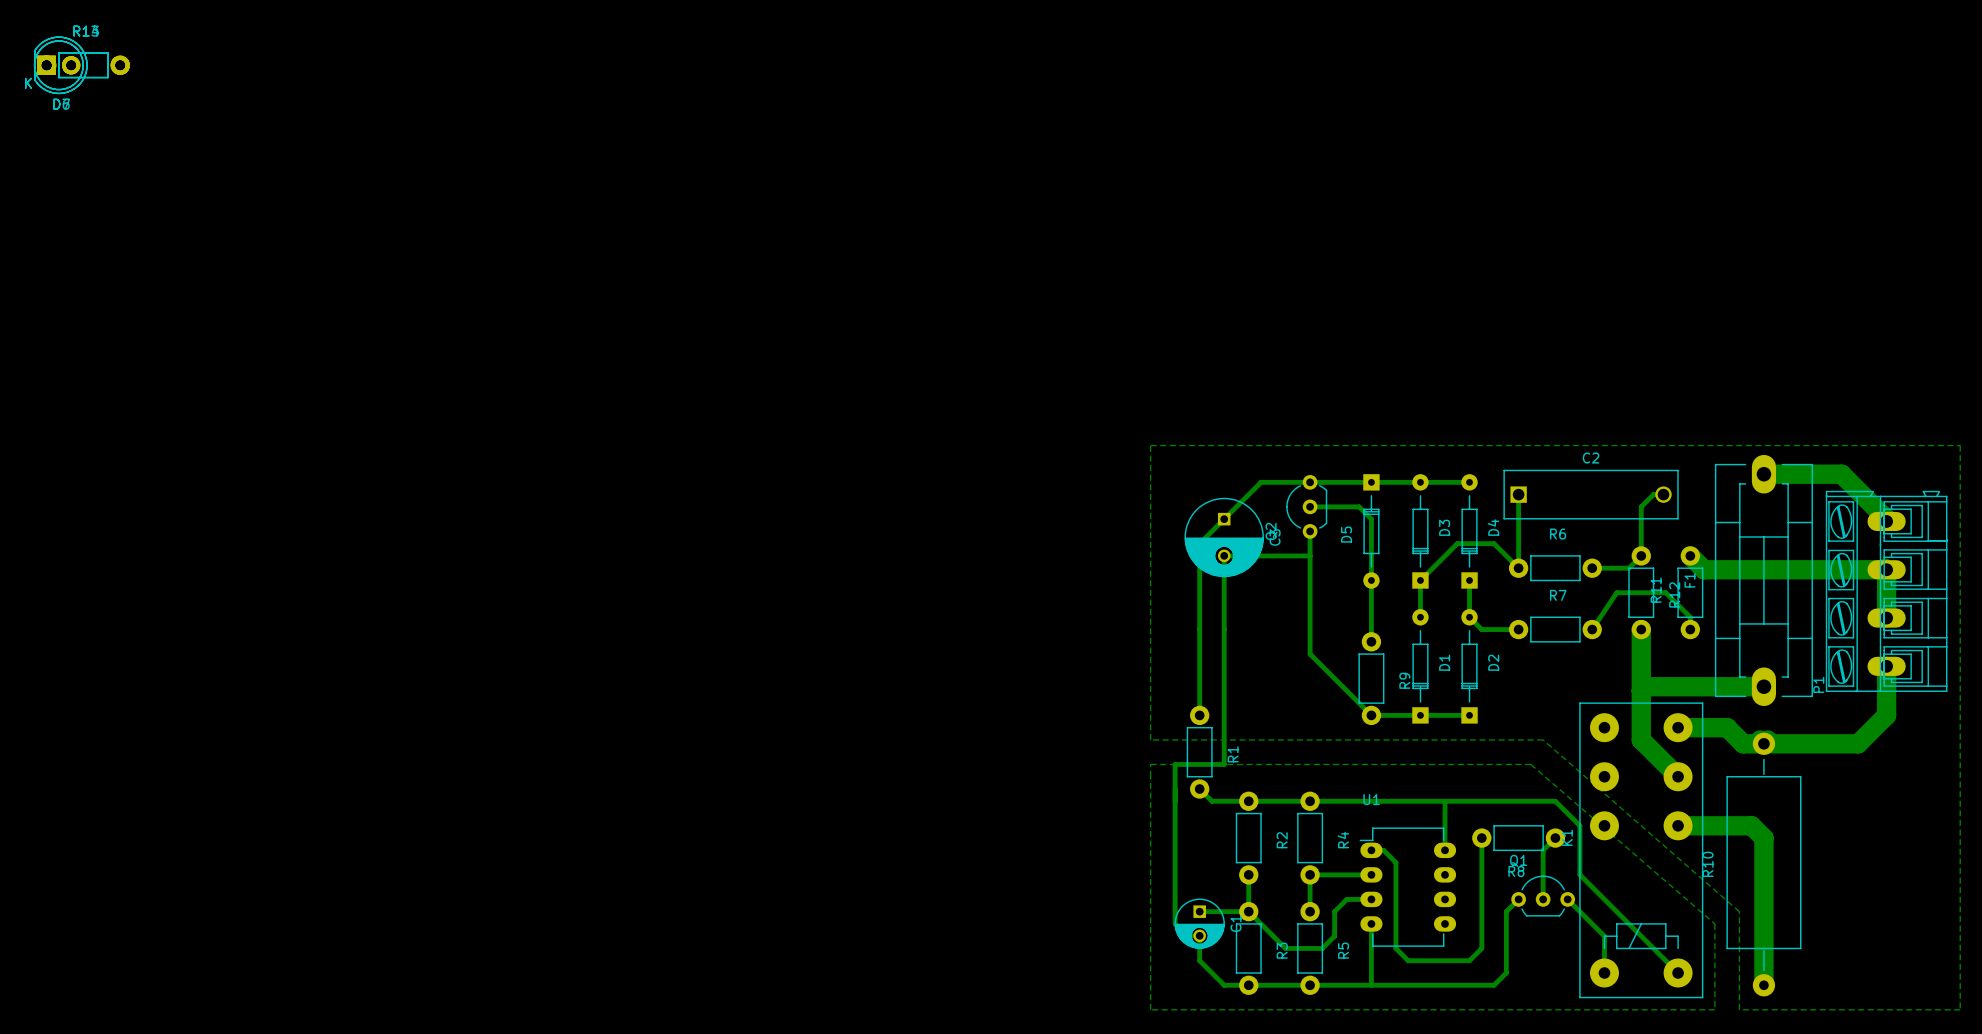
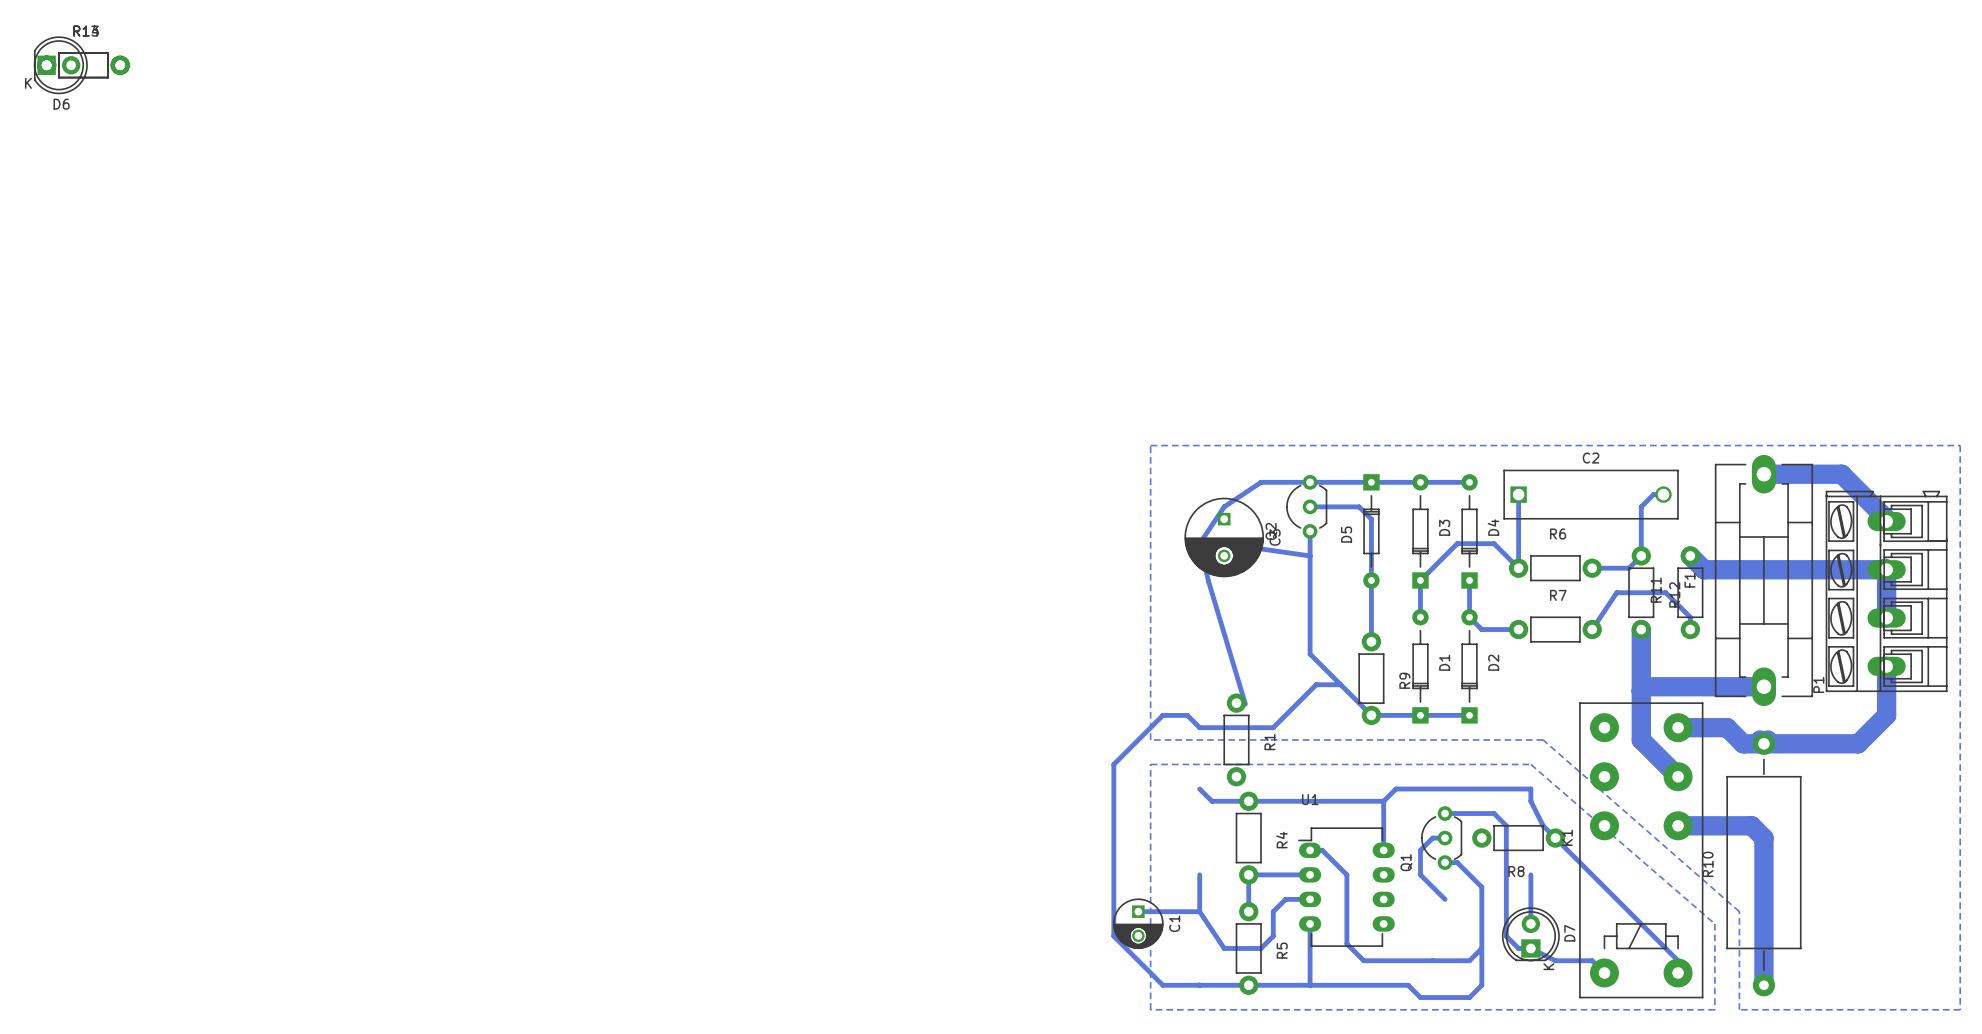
D7 rotation: 0° (60, 65) -> 90° counterclockwise (1530, 934)
D7 position: (60, 65) -> (1530, 934)
bottom track: (1261, 482) (1199, 543) (1199, 715) -> (1261, 482) (1224, 506) (1199, 543) (1208, 581) (1245, 704)
bottom track: (1224, 555) (1310, 555) -> (1224, 543) (1310, 555)
bottom track: (1224, 555) (1224, 764) (1175, 764) (1175, 923) (1187, 935) (1199, 935) (1199, 960) (1224, 985) -> (1340, 684) (1316, 684) (1273, 727) (1199, 727) (1187, 715) (1162, 715) (1113, 764) (1113, 936) (1162, 985) (1224, 985)
R1 position: (1199, 752) -> (1236, 739)
bottom track: (1383, 801) (1555, 801) (1579, 825) (1579, 874) (1678, 973) -> (1383, 850) (1383, 801) (1395, 789) (1530, 789) (1530, 801) (1543, 825) (1678, 960) (1678, 973)
bottom track: (1445, 801) (1445, 850) -> (1530, 874) (1530, 923)
R4: (1310, 838) -> none
bottom track: none -> (1445, 838) (1432, 838) (1420, 850) (1420, 874) (1445, 899)
bottom track: (1481, 838) (1481, 887) -> (1445, 862) (1457, 862) (1481, 887)
bottom track: (1555, 838) (1543, 850) (1543, 899) -> none
R2 name: R2 (1282, 840) -> R4 (1281, 840)
bottom track: (1371, 850) (1383, 850) (1395, 862) (1395, 948) (1408, 960) -> (1310, 850) (1322, 850) (1346, 874) (1346, 943) (1363, 960) (1408, 960)
bottom track: none -> (1199, 874) (1199, 911)
bottom track: none -> (1248, 874) (1310, 874)
bottom track: (1371, 874) (1310, 874) (1310, 911) -> none
U1 position: (1407, 887) -> (1346, 887)
Q1 rotation: 0° (1543, 896) -> 90° counterclockwise (1441, 838)
Q1 position: (1543, 896) -> (1441, 838)
bottom track: (1371, 899) (1346, 899) (1334, 911) (1334, 936) (1322, 948) (1285, 948) (1248, 911) (1199, 911) -> (1310, 899) (1285, 899) (1273, 911) (1273, 936) (1261, 948) (1224, 948) (1199, 911)
bottom track: (1518, 899) (1506, 911) -> (1445, 813) (1494, 813) (1506, 825) (1506, 911)
bottom track: (1567, 899) (1604, 936) (1604, 973) -> (1506, 936) (1518, 948) (1530, 948) (1555, 960) (1592, 960) (1604, 973)
bottom track: none -> (1138, 911) (1199, 911)
C1 position: (1199, 923) -> (1138, 923)
bottom track: (1371, 923) (1371, 985) -> (1310, 923) (1310, 985)
bottom track: (1506, 936) (1506, 973) (1494, 985) (1408, 985) -> (1481, 948) (1481, 985) (1469, 997) (1420, 997) (1408, 985)
R5: (1310, 948) -> none
R3 name: R3 (1282, 950) -> R5 (1282, 950)

